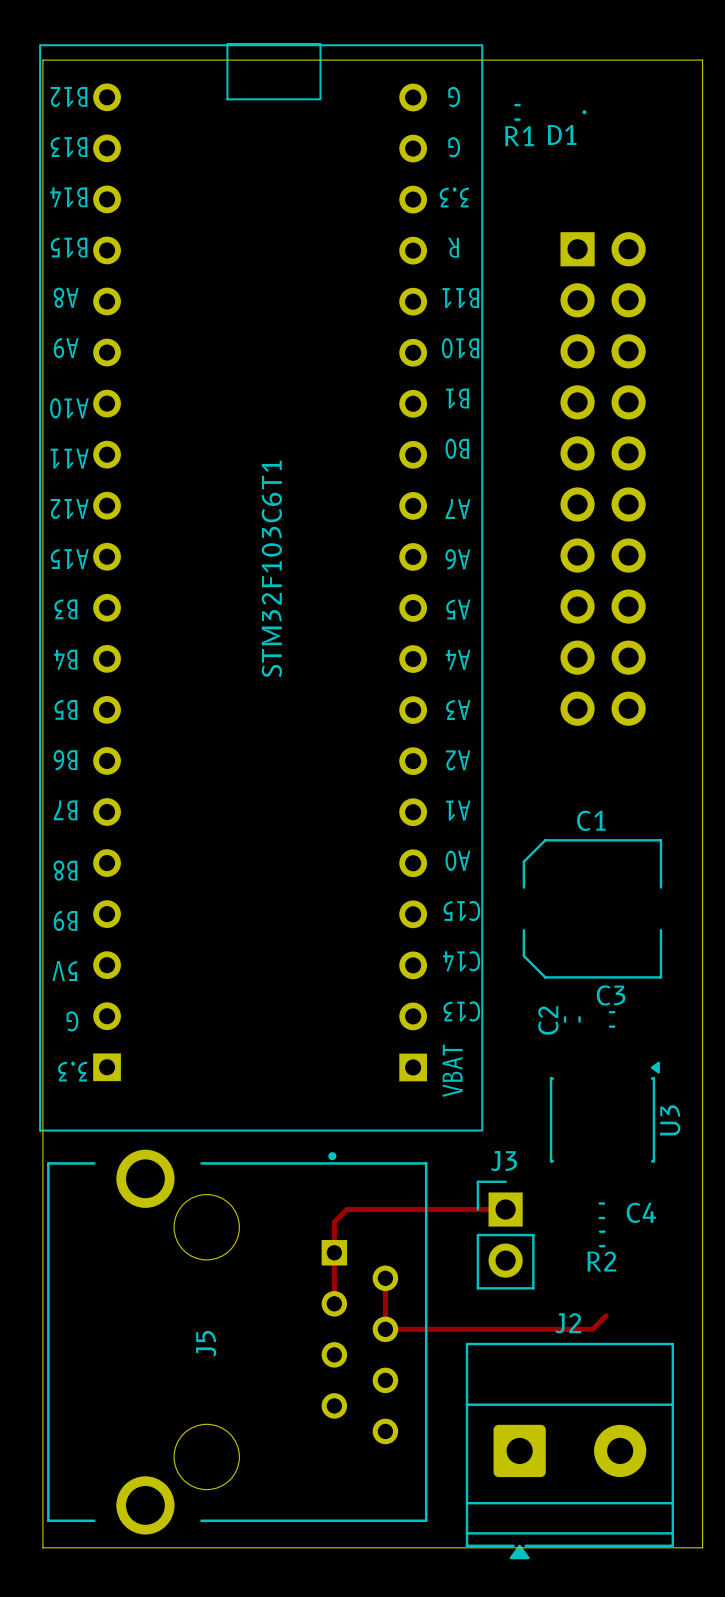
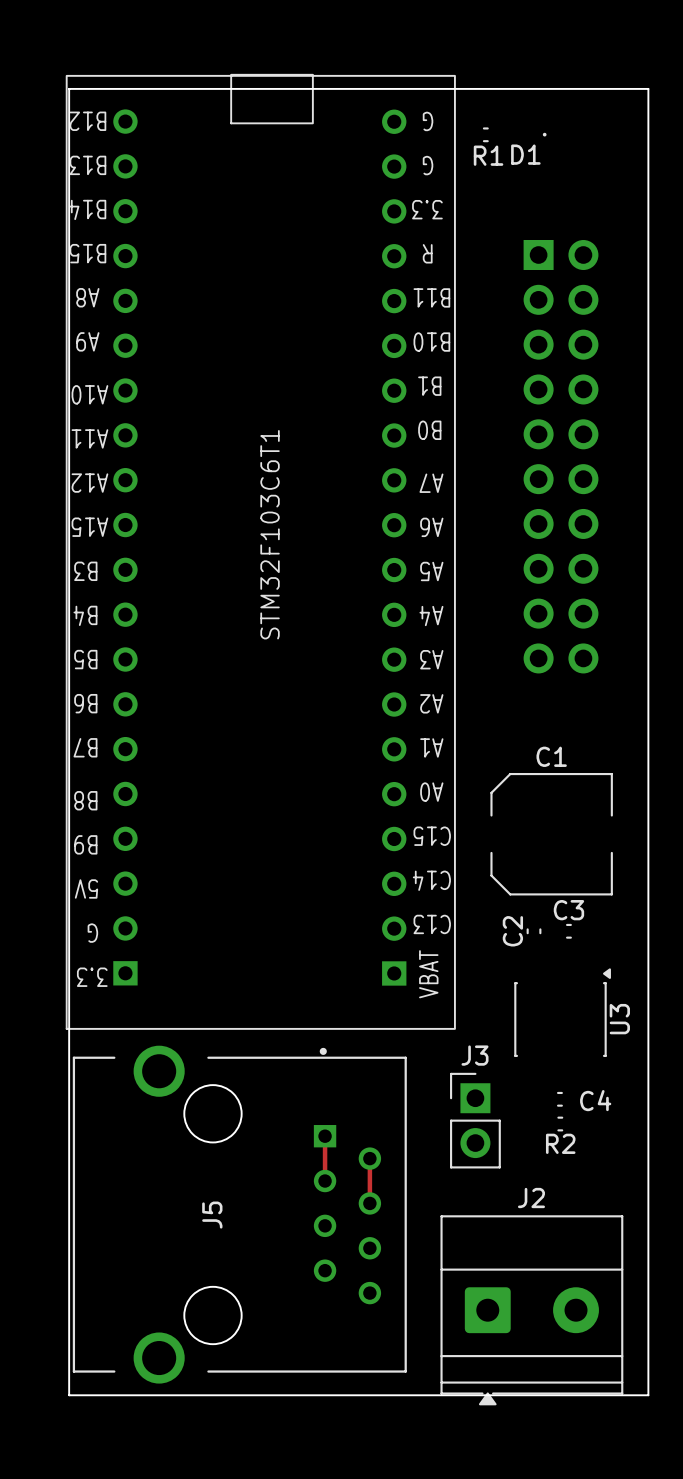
track: (505, 1209) (347, 1209) (334, 1222) (334, 1252) -> none
track: (606, 1315) (592, 1329) (385, 1329) -> none

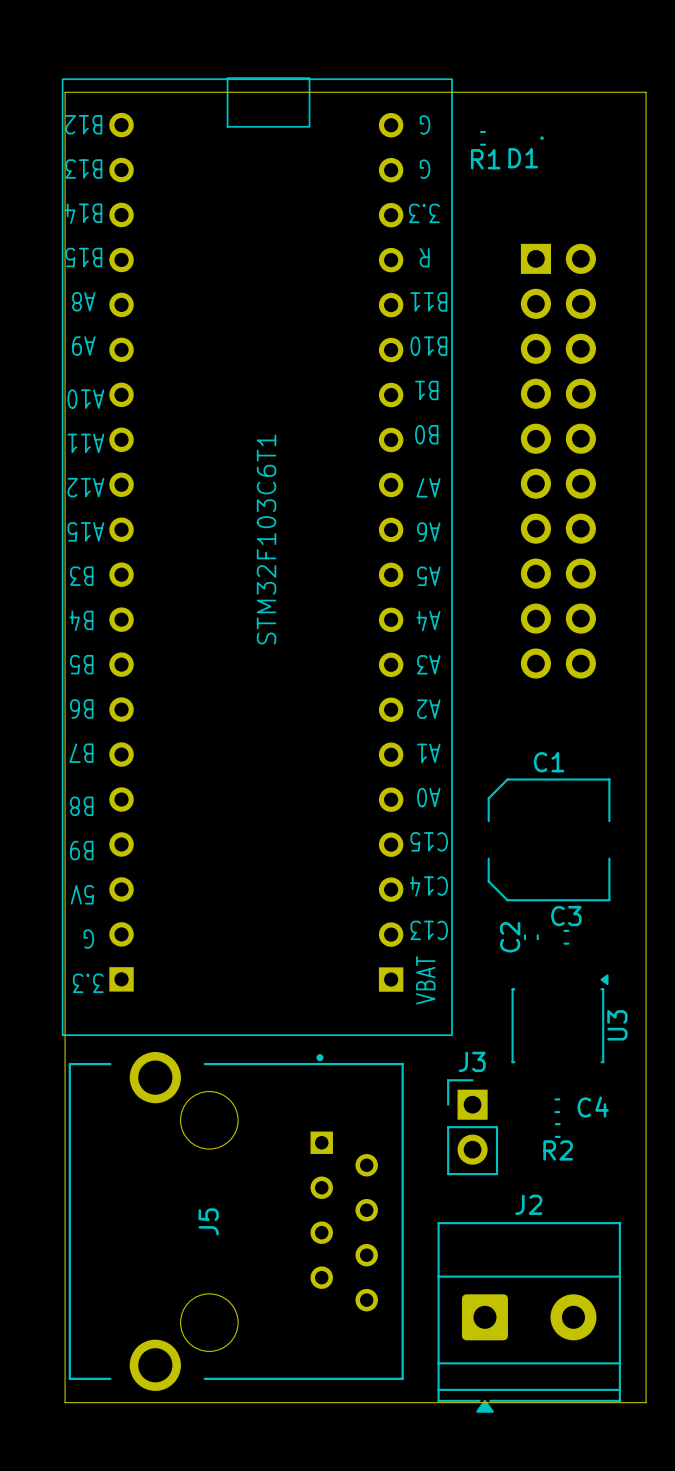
track: (325, 1136) (325, 1181) -> none
track: (369, 1158) (369, 1203) -> none

